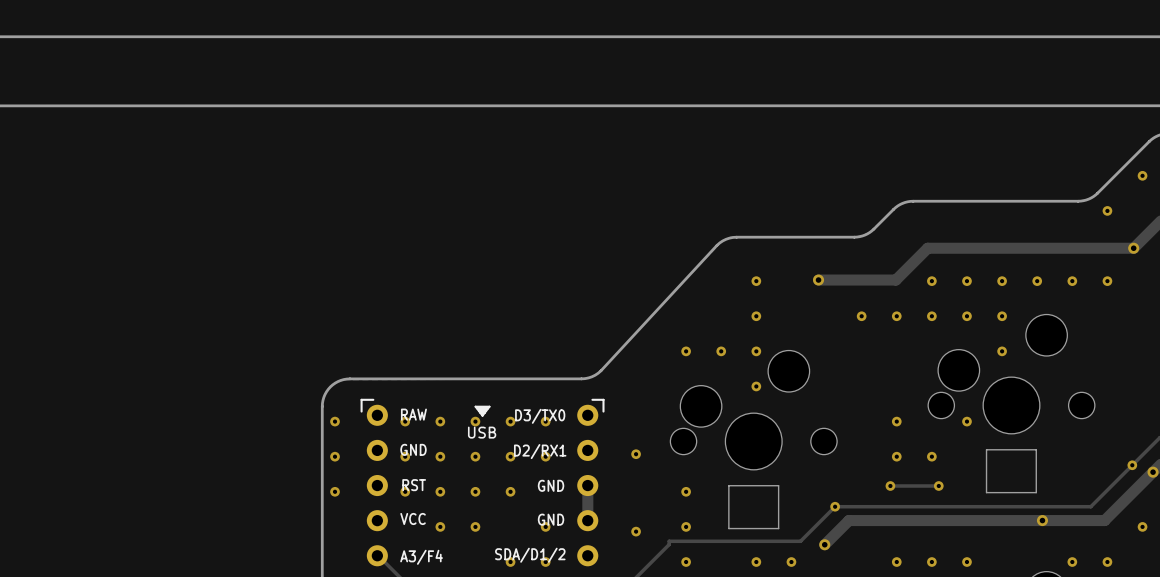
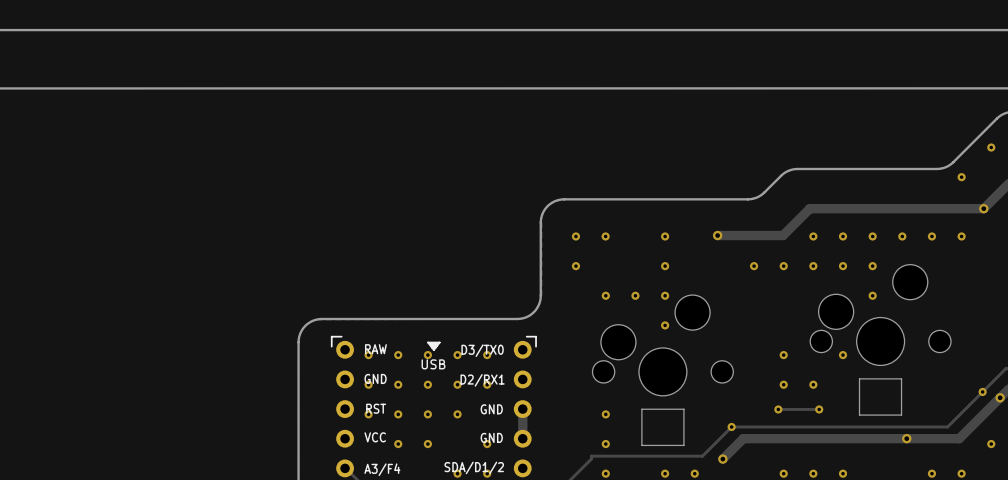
board edge: (854, 237) (736, 237) (722, 240) (601, 370) (592, 376) (581, 378) -> (747, 199) (564, 199) (554, 201) (545, 208) (540, 220) (539, 301) (531, 314) (517, 319)
via: none -> (575, 236)
via: none -> (605, 236)
via: none -> (575, 266)
via: (335, 421) -> none
via: (636, 454) -> none
via: (335, 456) -> none
via: (335, 491) -> none
via: (636, 531) -> none

